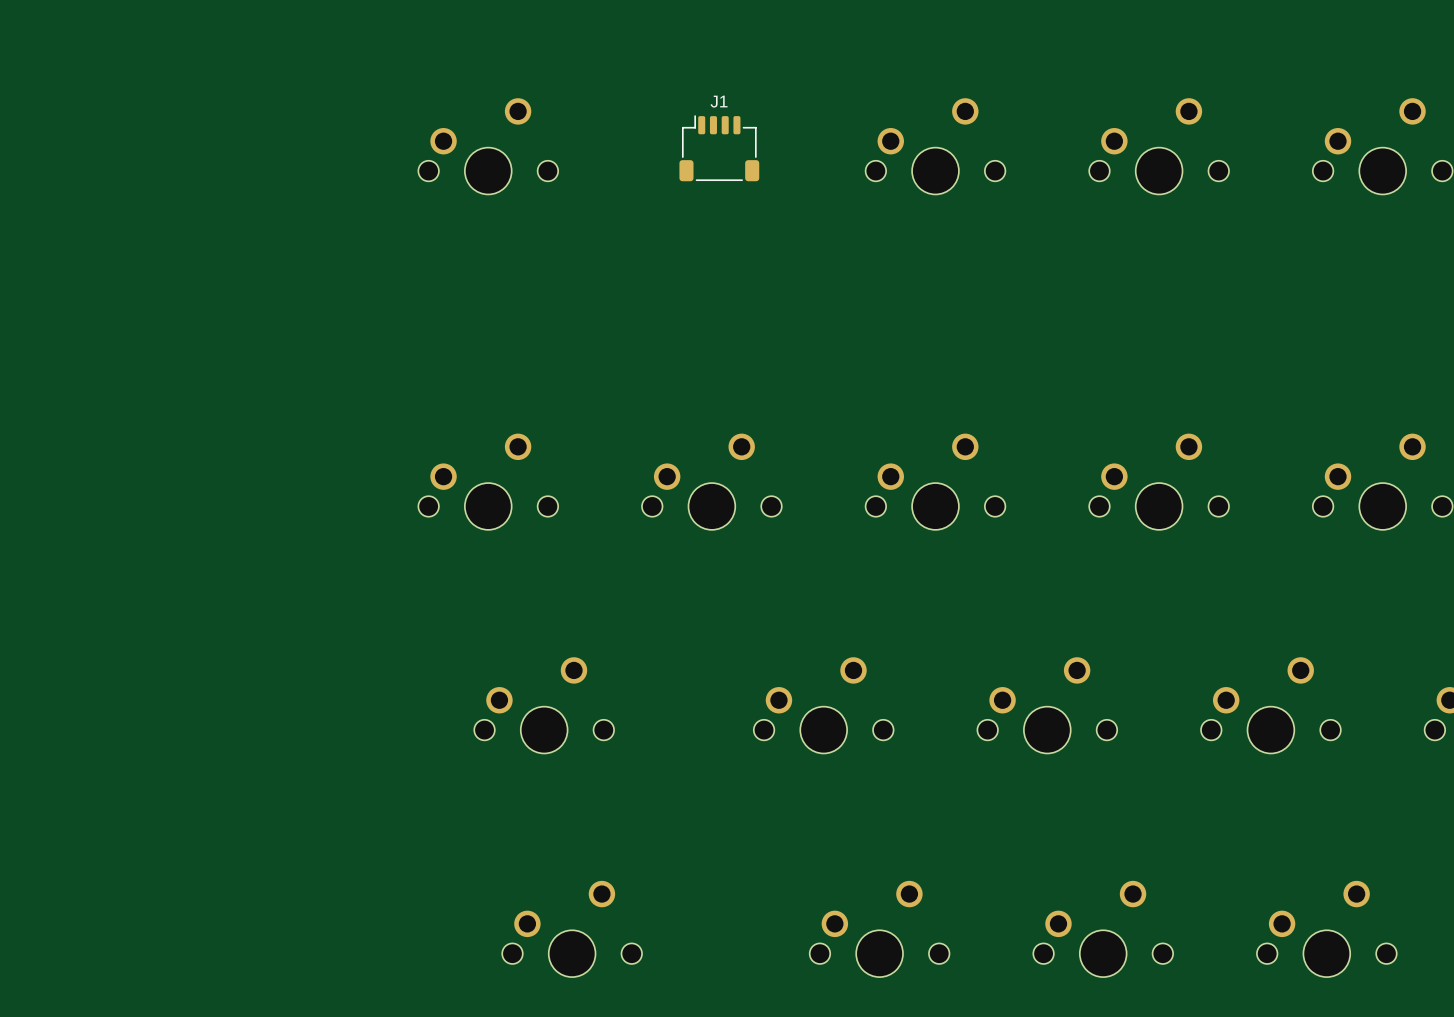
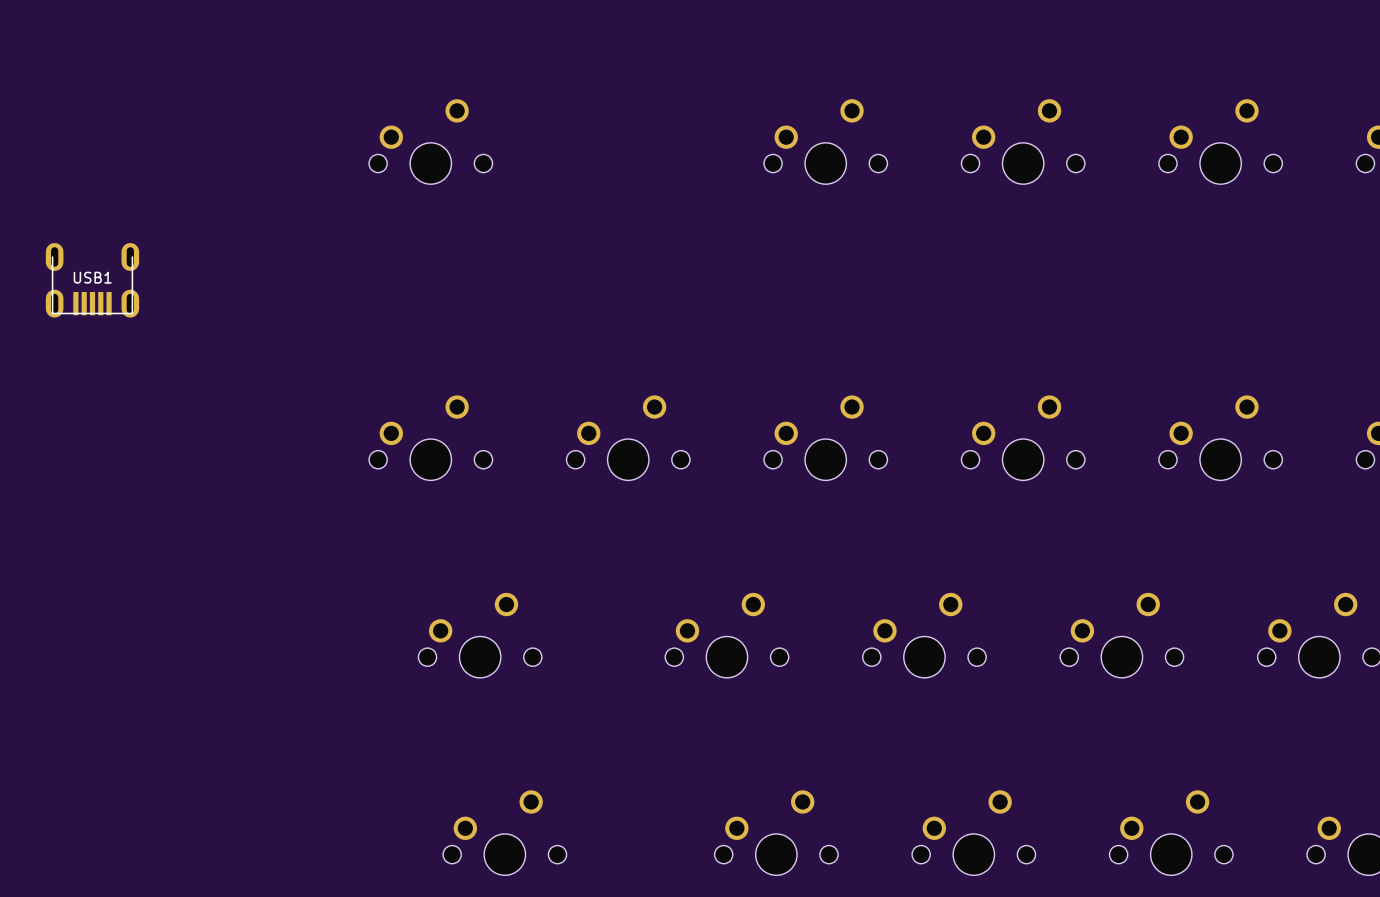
J1: (719, 148) -> none
USB1: none -> (92, 280)

